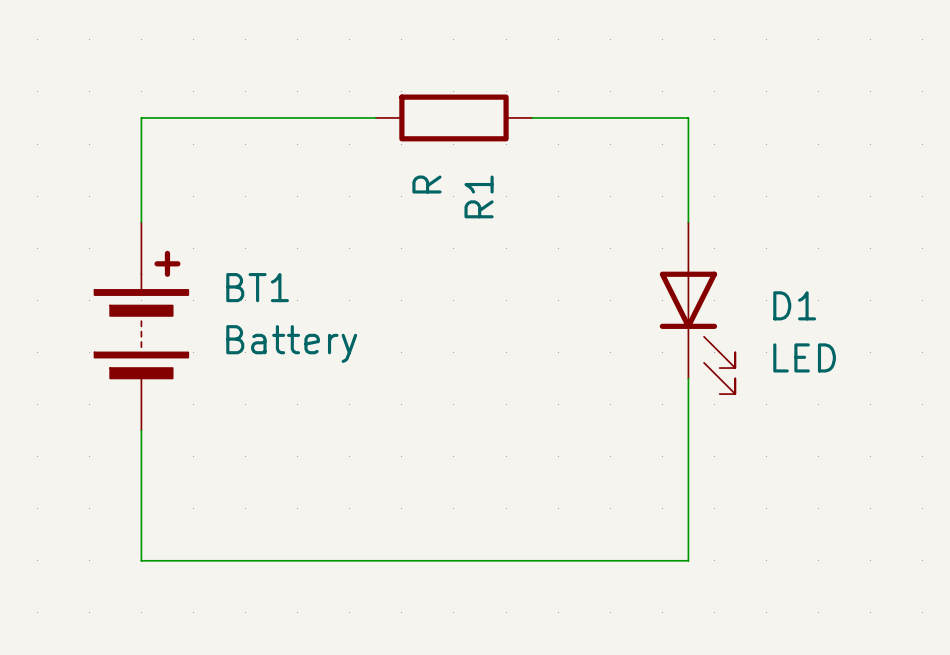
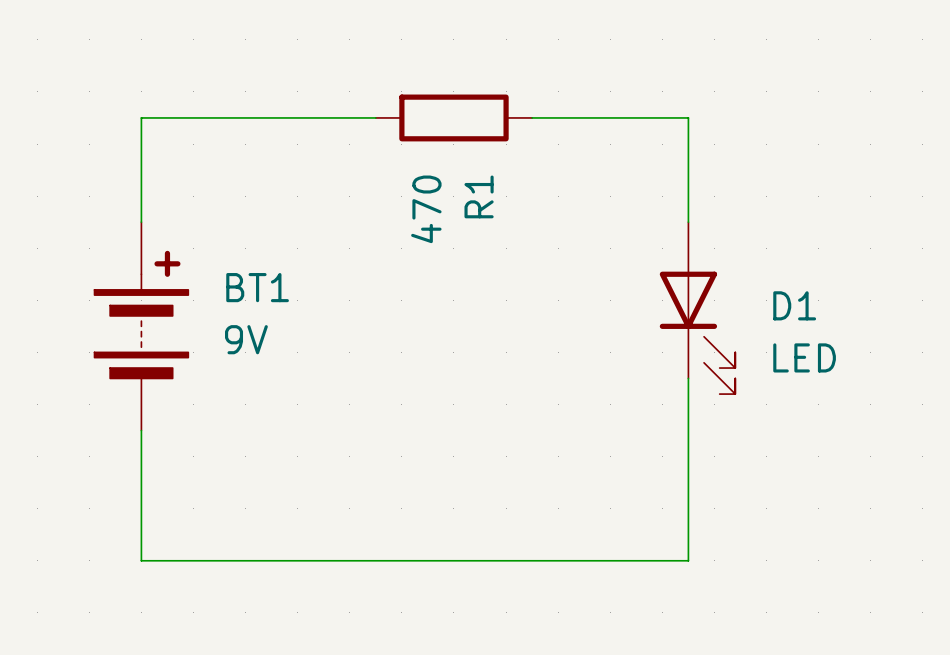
R1 value: R (426, 184) -> 470 (426, 209)
BT1 value: Battery (291, 344) -> 9V (246, 339)

